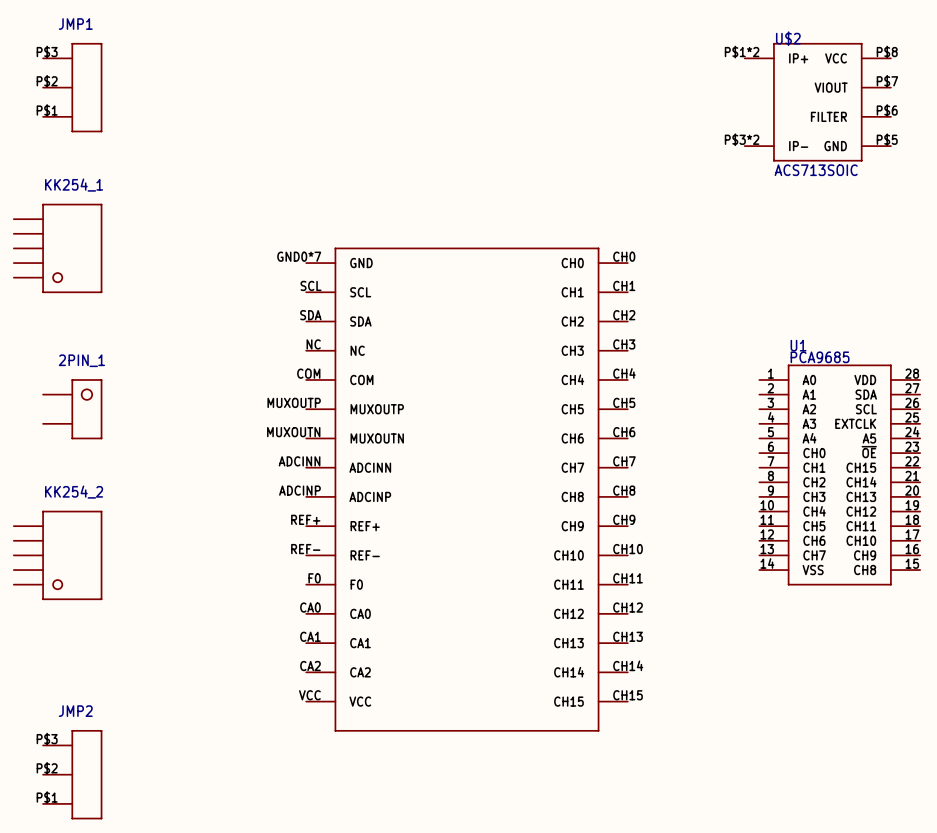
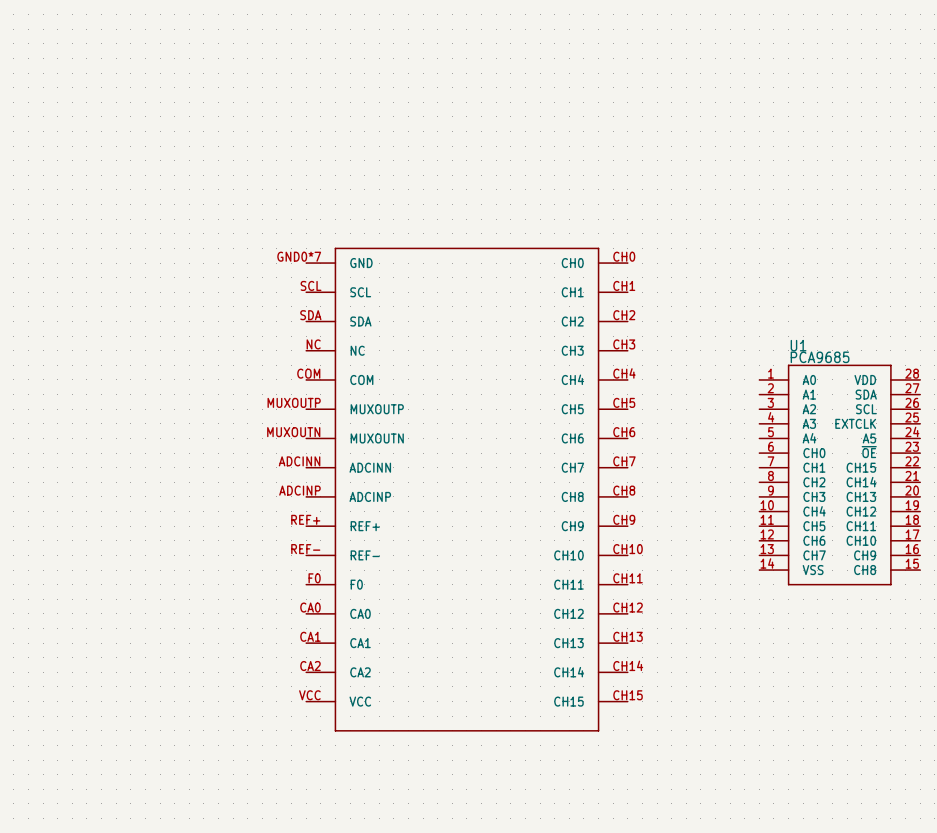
JMP1: (72, 87) -> none
U$2: ACS713SOIC (817, 102) -> none
KK254_1: (58, 248) -> none
2PIN_1: (72, 409) -> none
KK254_2: (58, 555) -> none
JMP2: (72, 774) -> none

